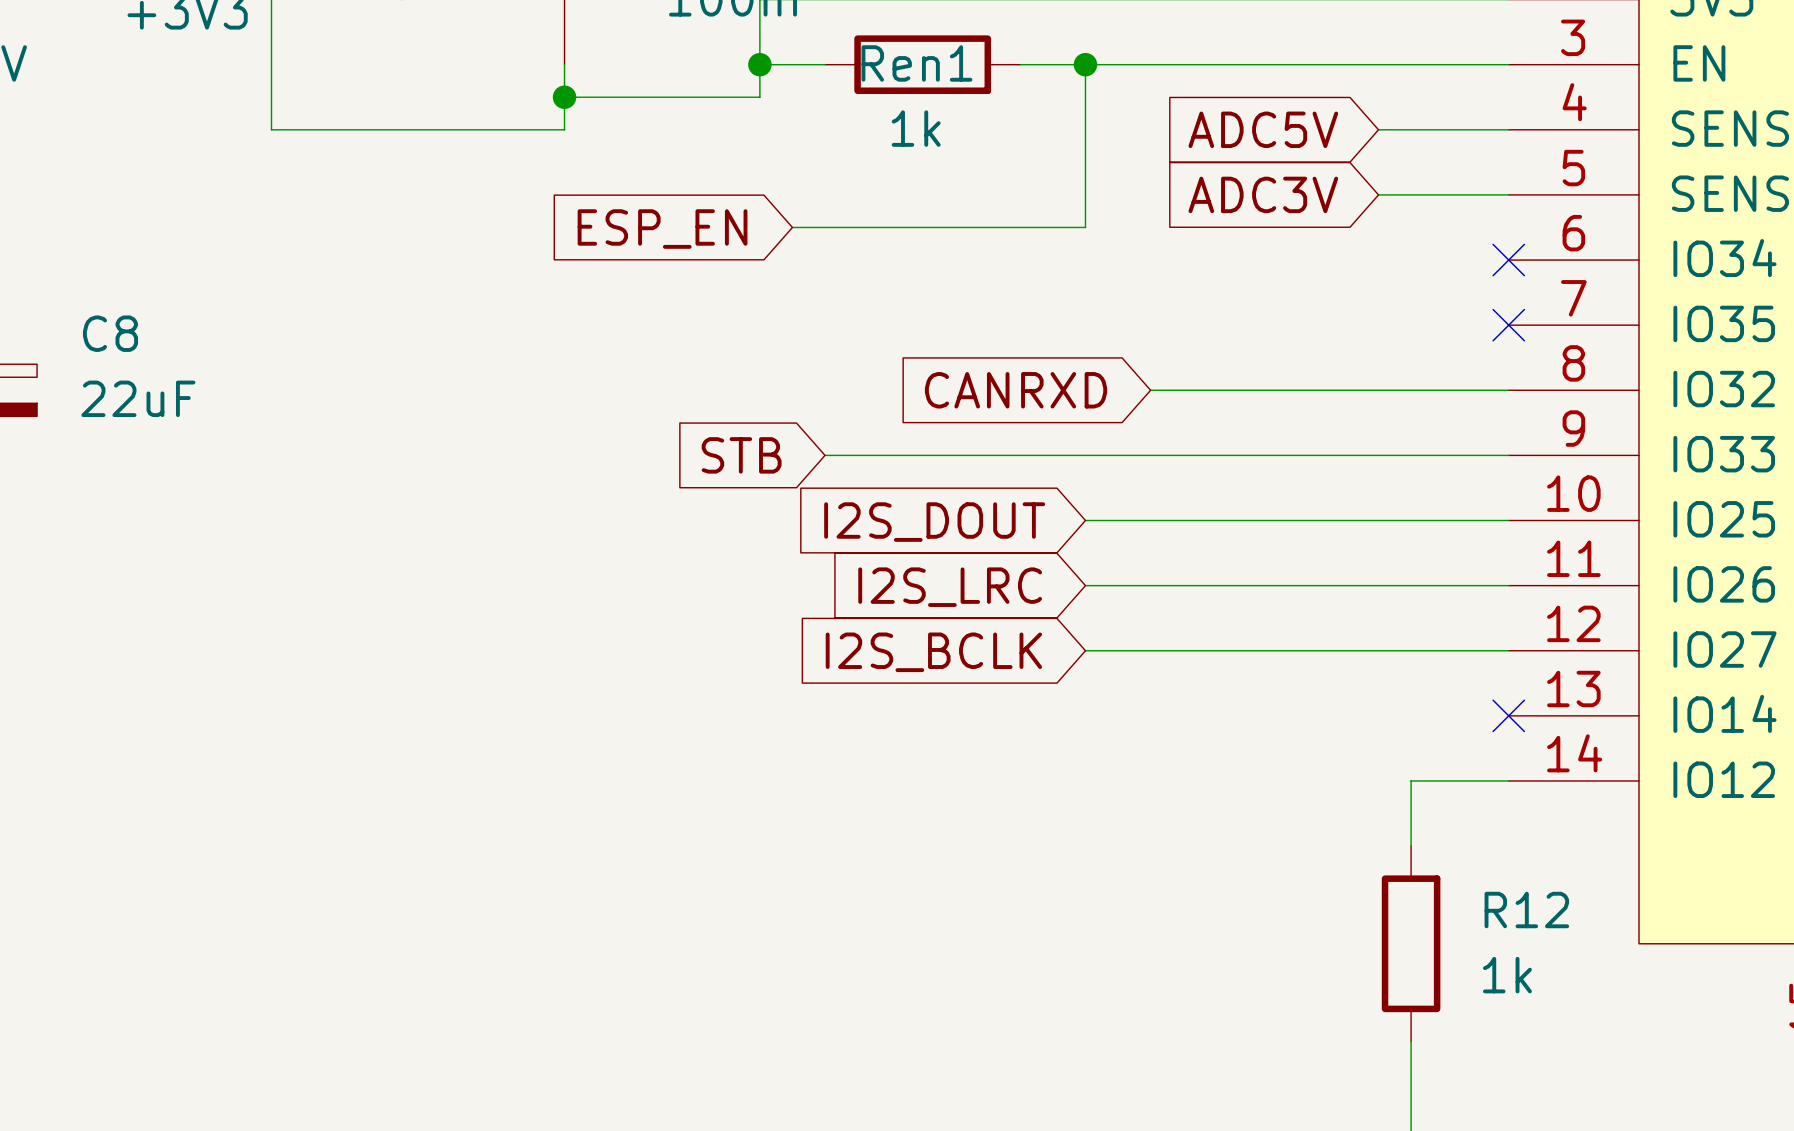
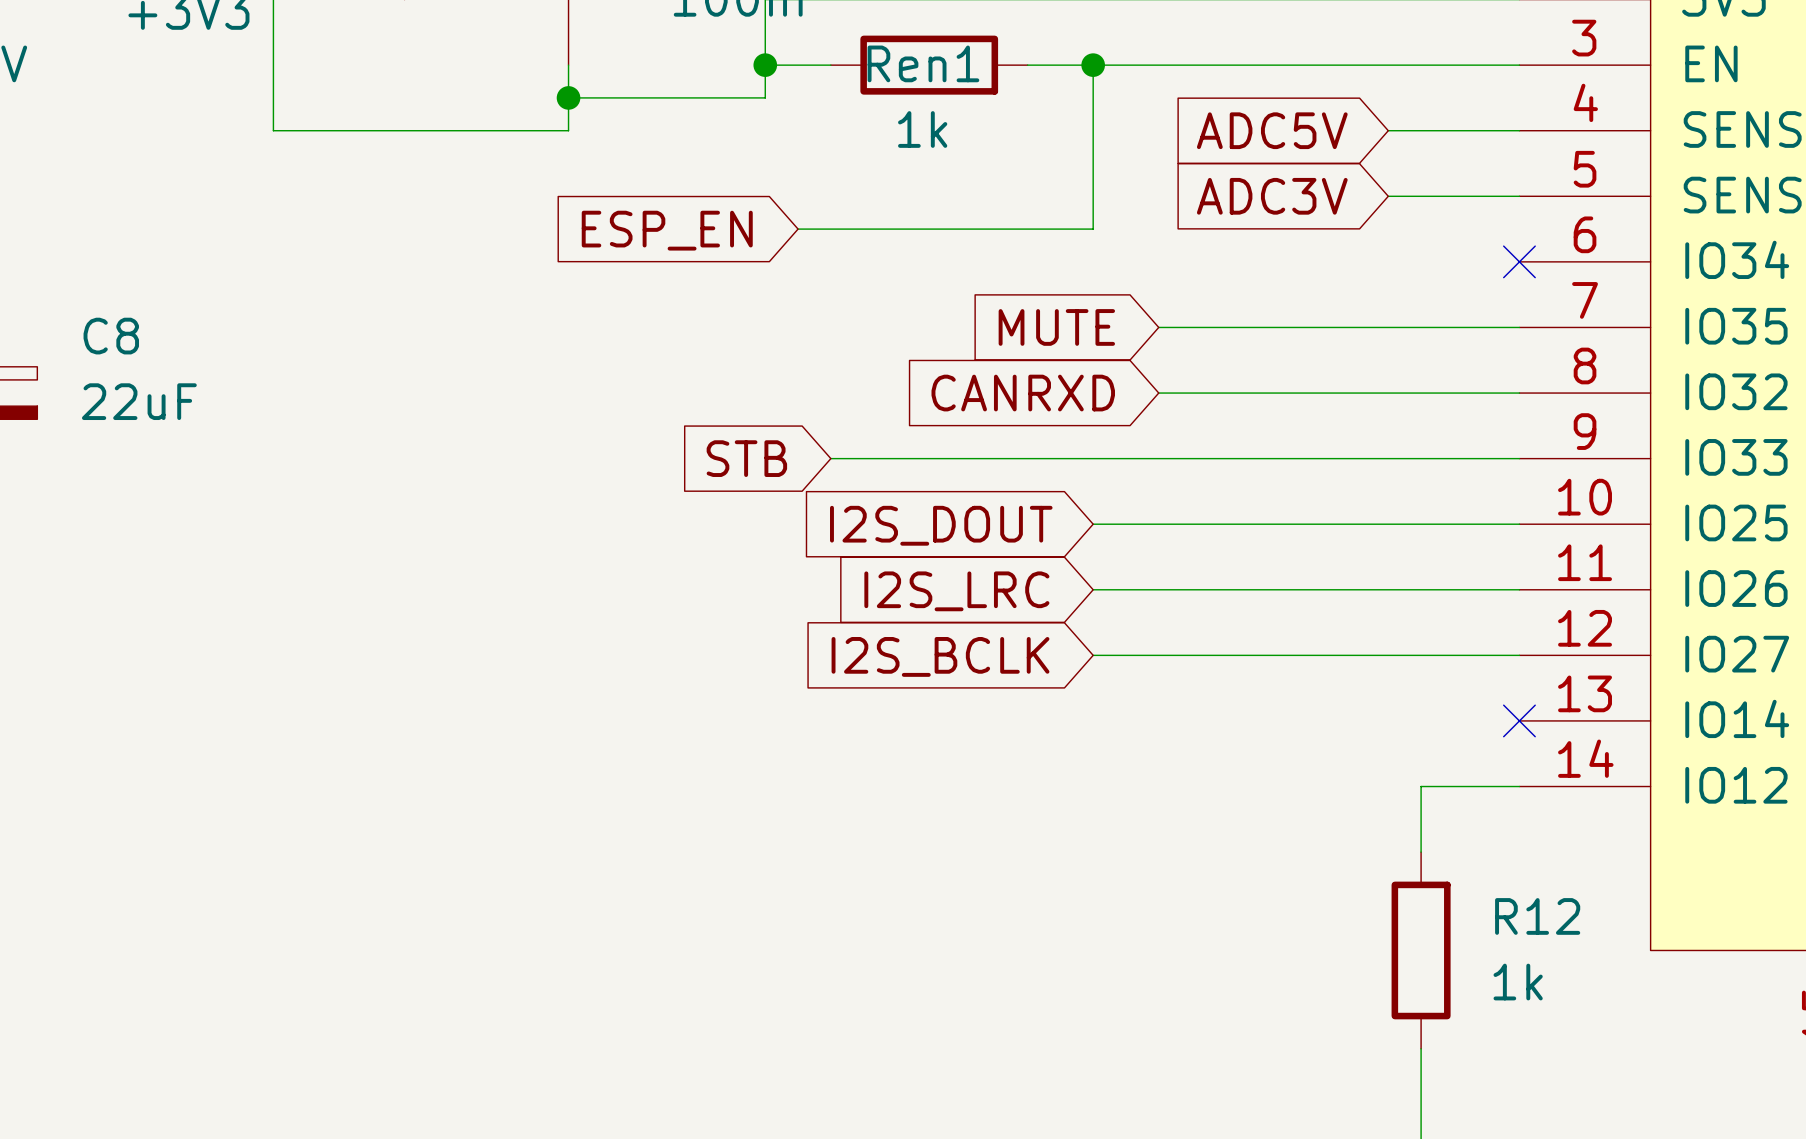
global label: none -> MUTE (1056, 327)
wire: none -> (1158, 327) (1519, 327)
no-connect mark: (1508, 325) -> none

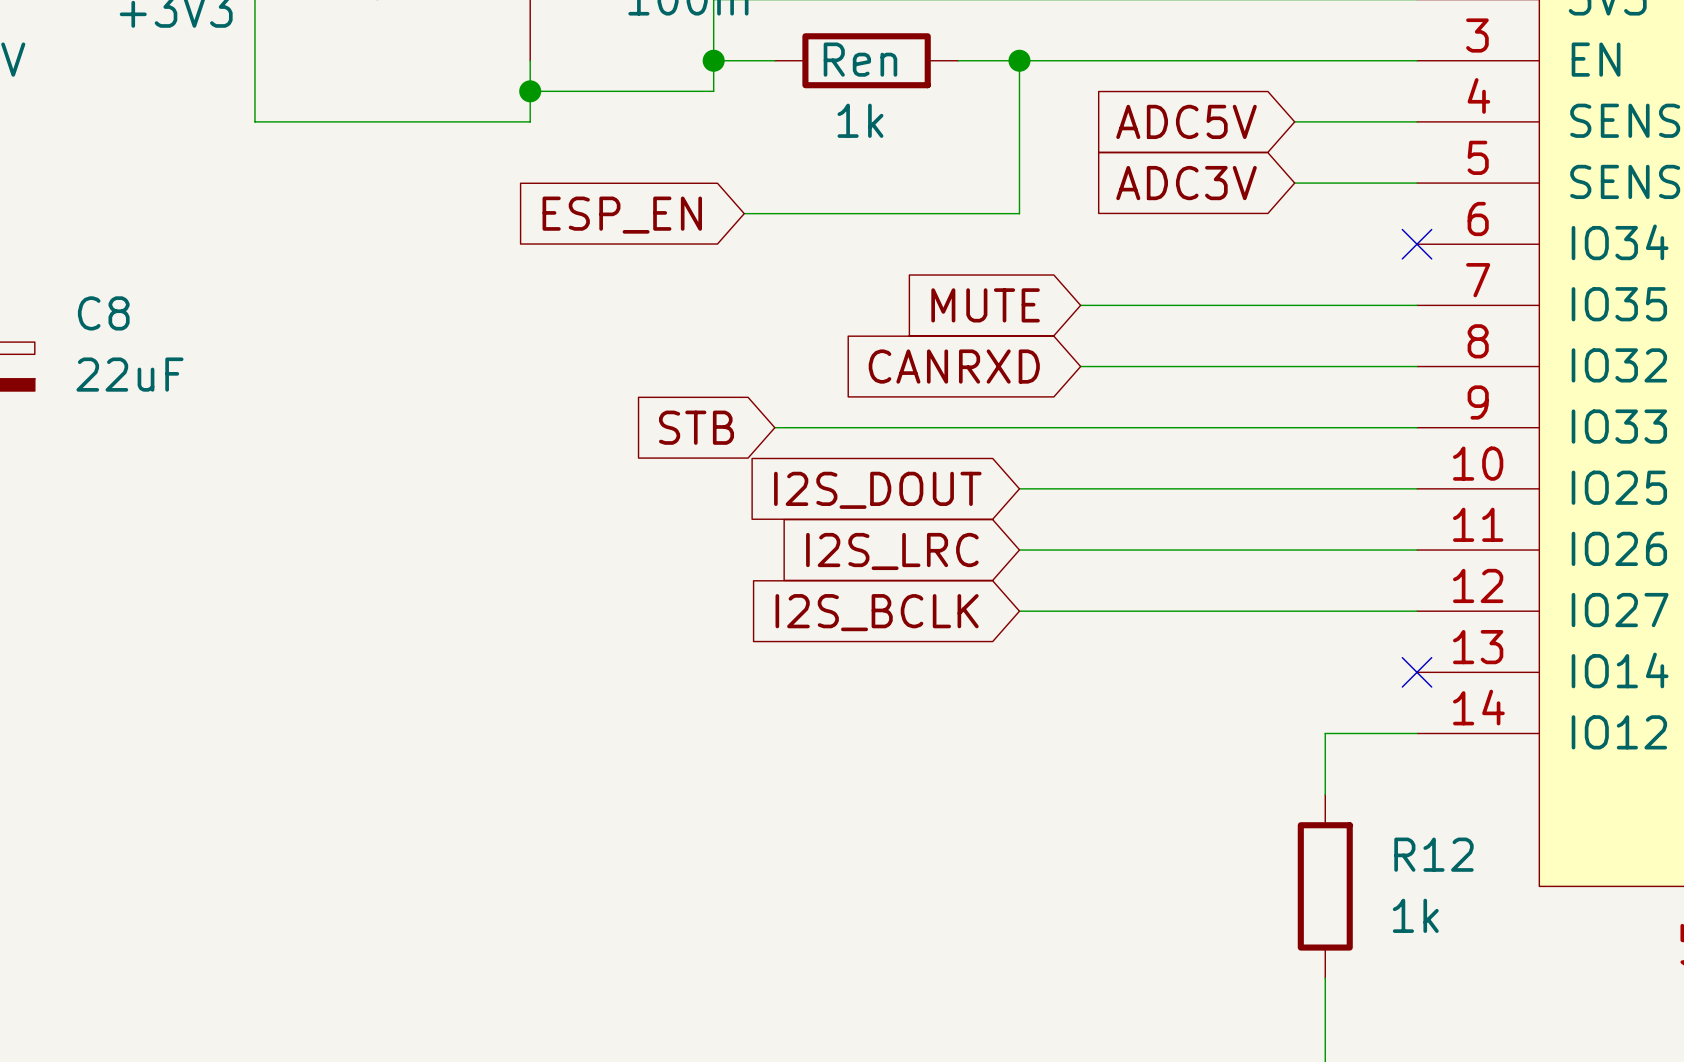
Ren1 name: Ren1 (923, 63) -> Ren (860, 59)

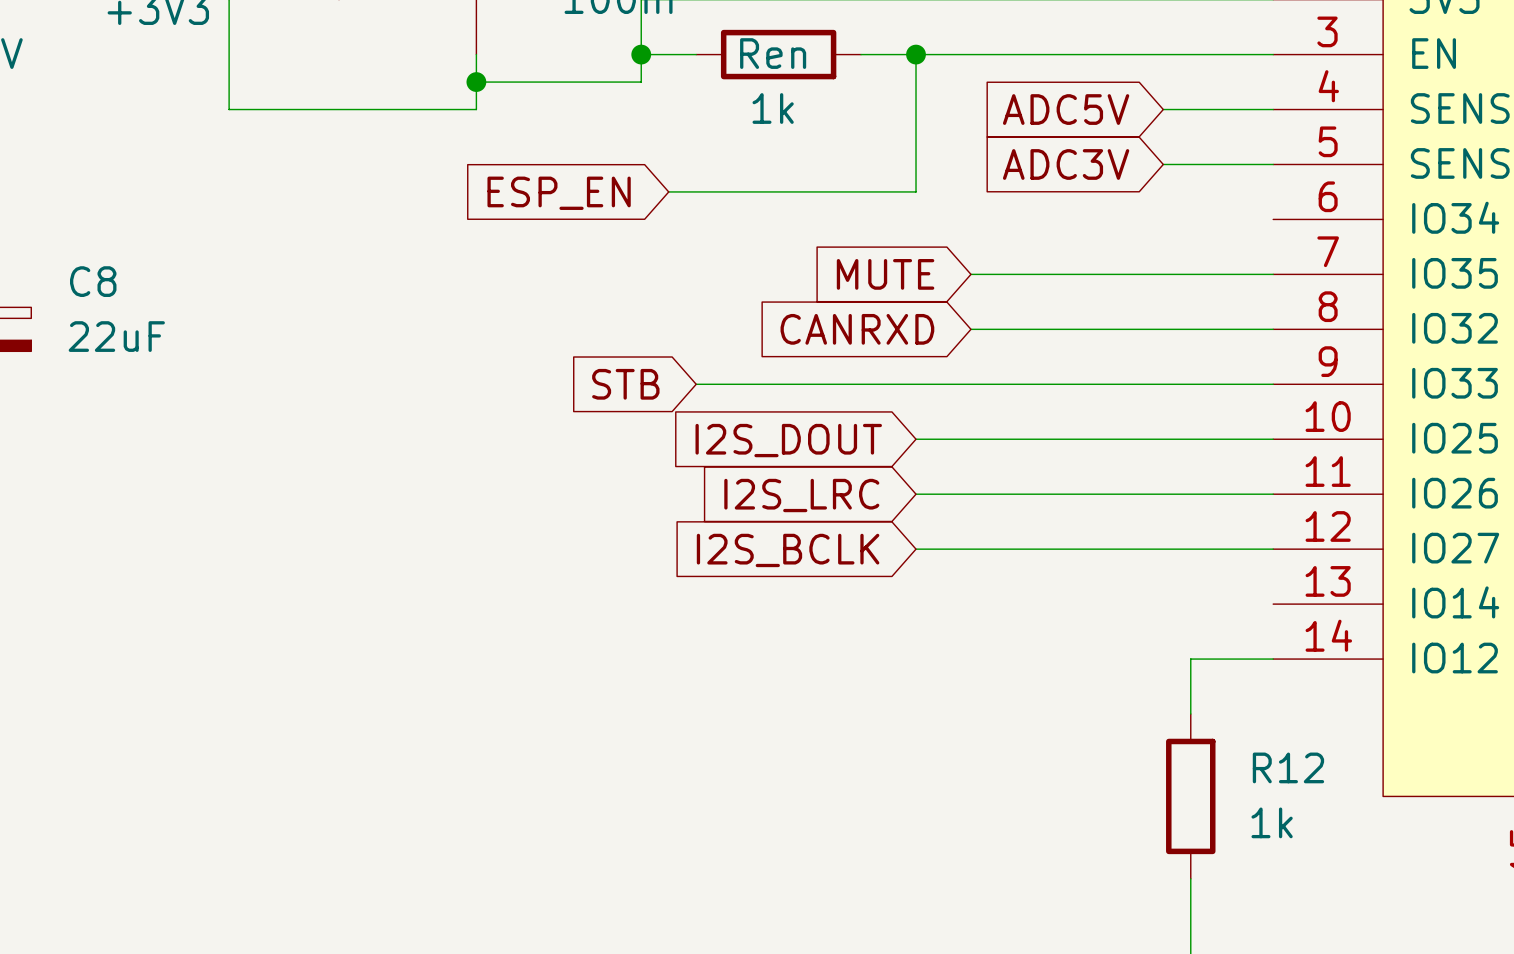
no-connect mark: (1417, 244) -> none
no-connect mark: (1417, 672) -> none

